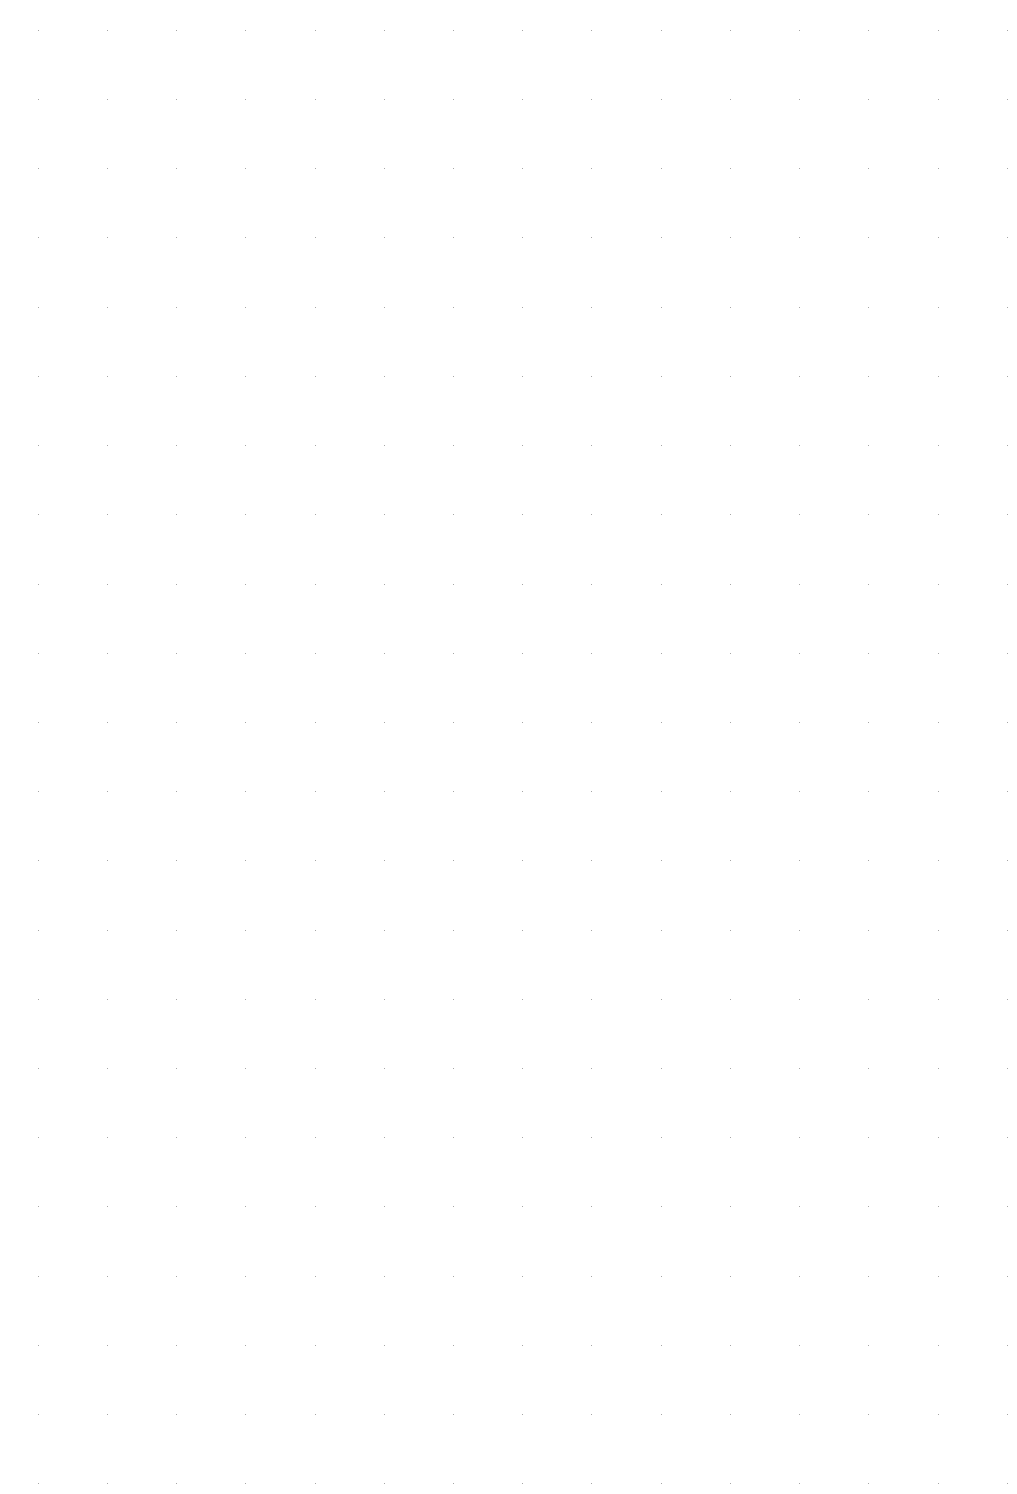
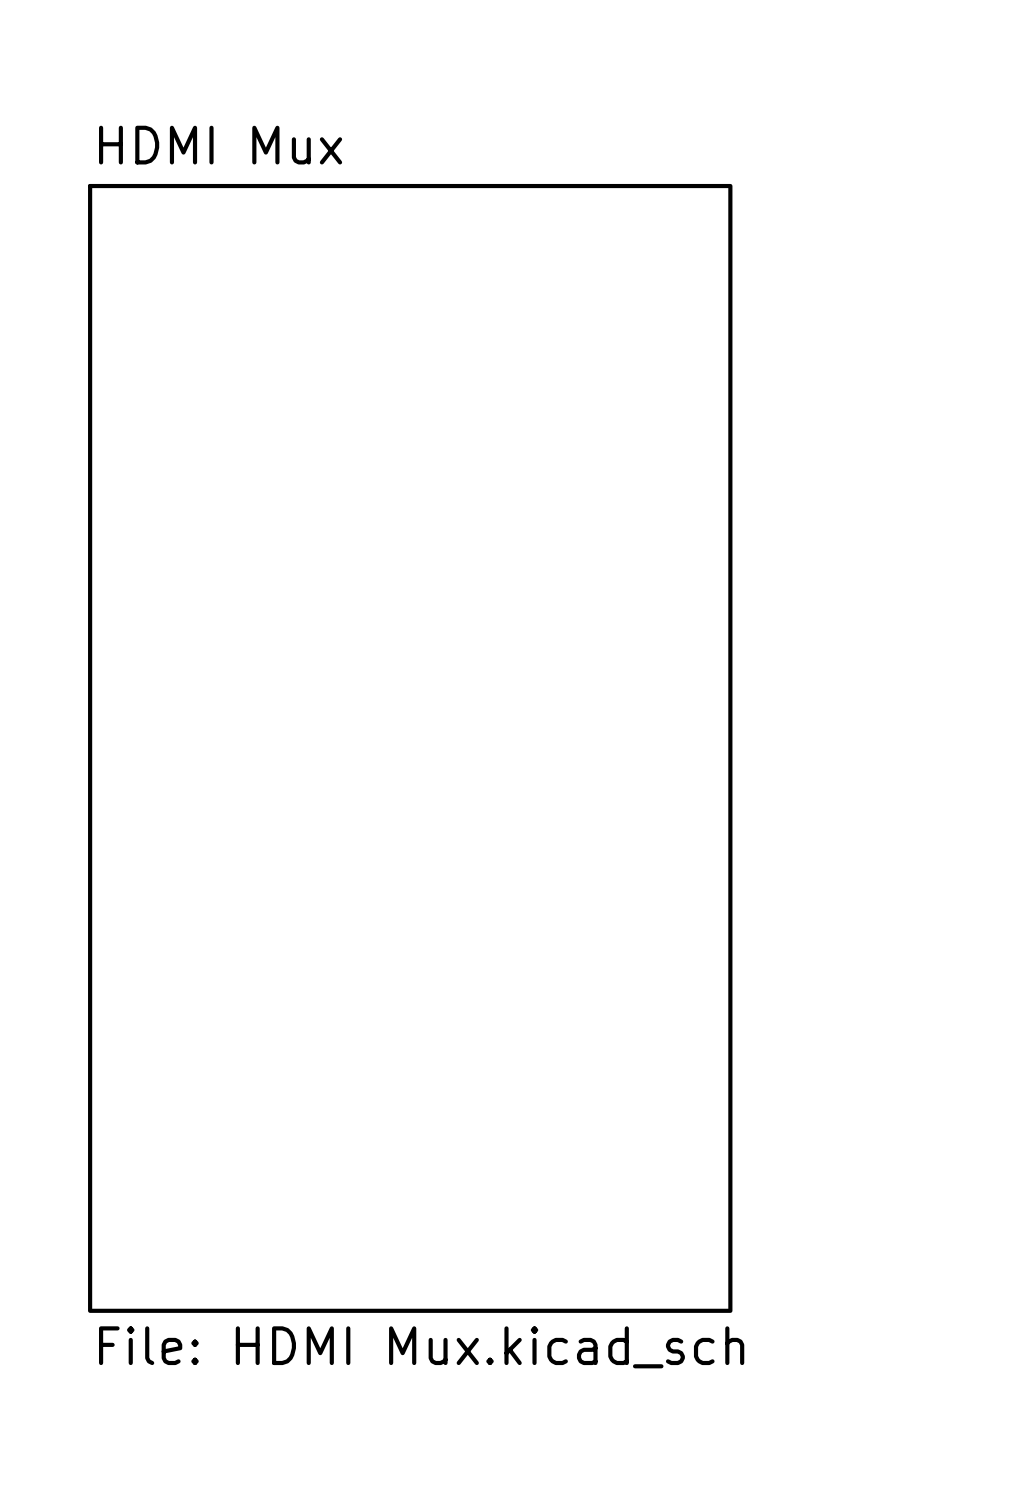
sheet HDMI Mux: none -> File: HDMI Mux.kicad_sch (410, 748)

